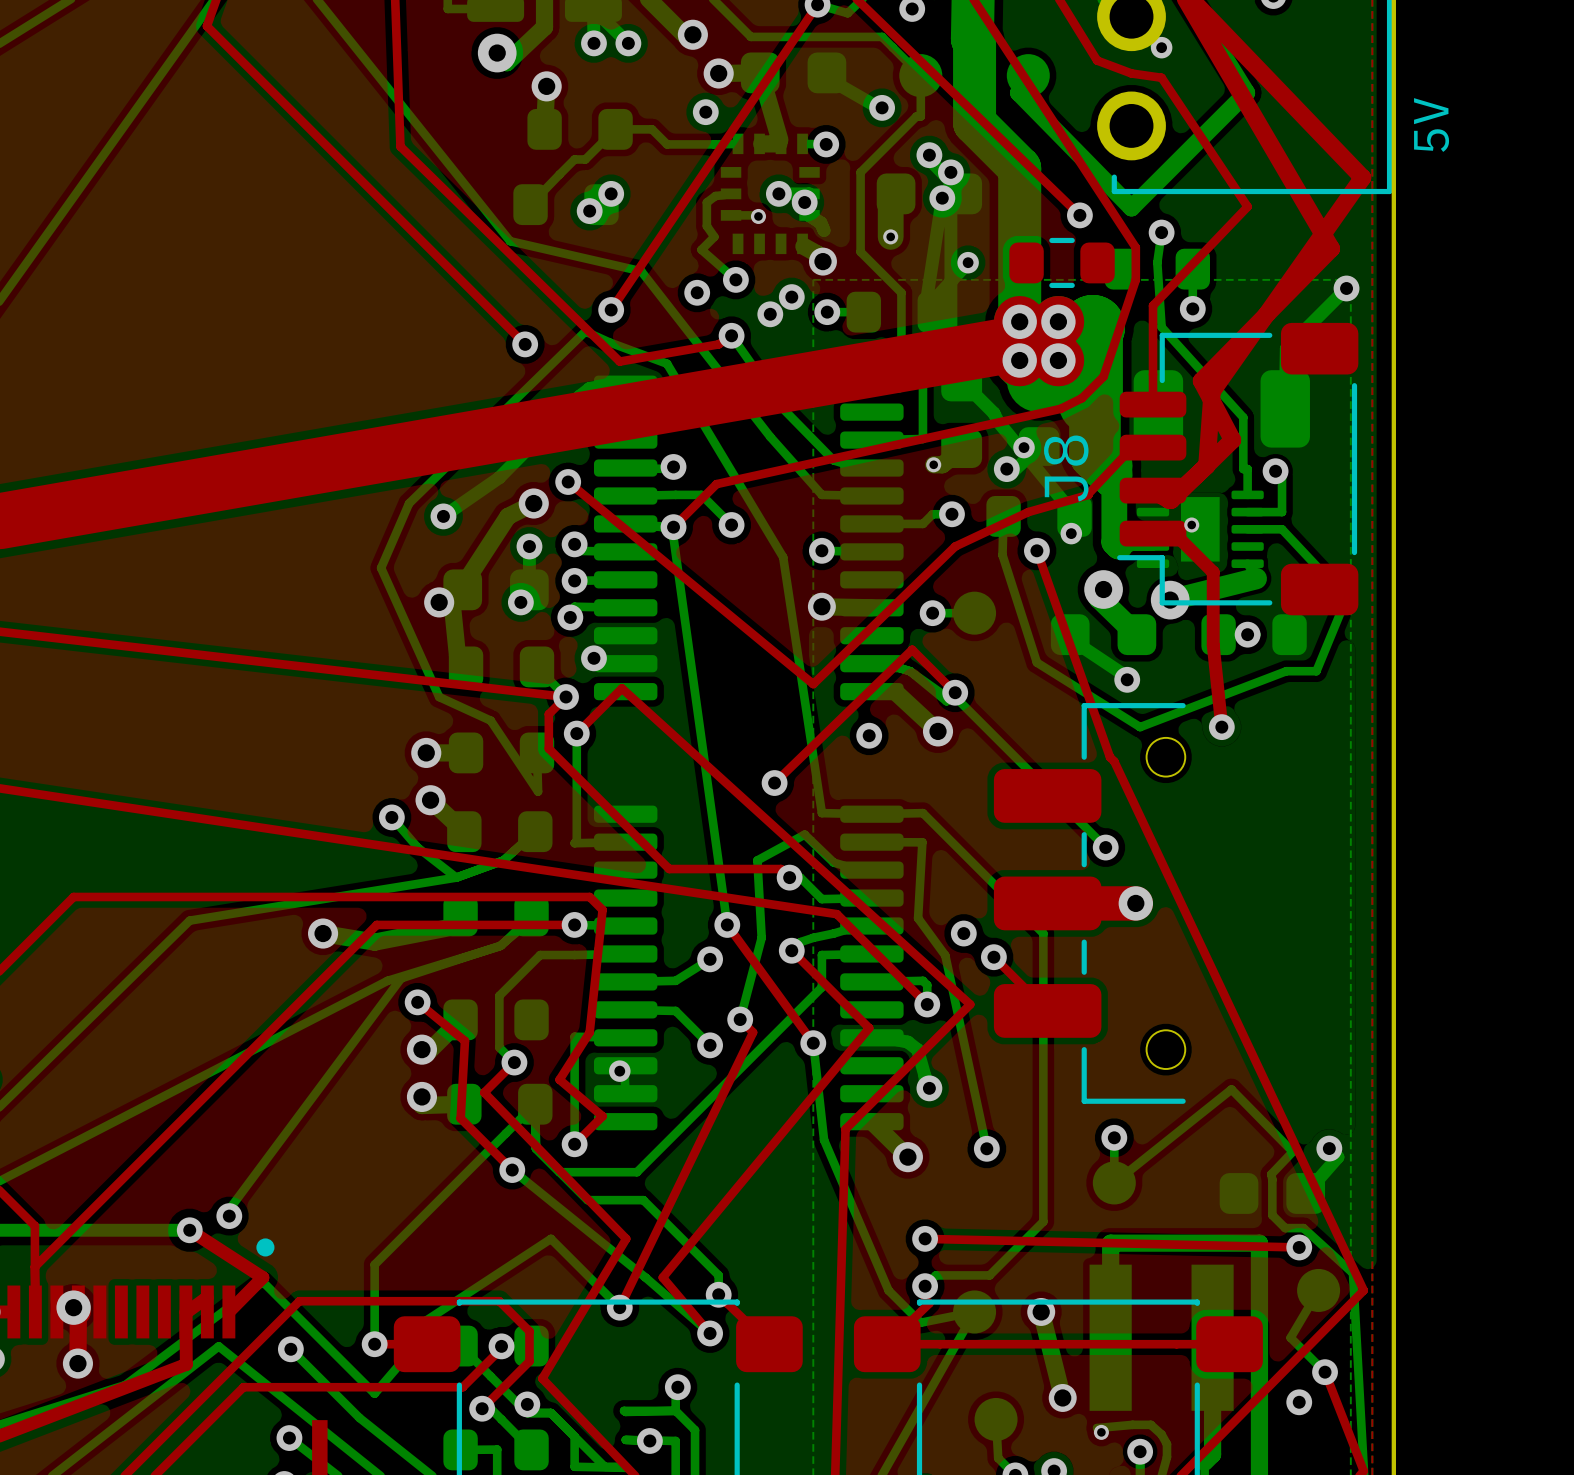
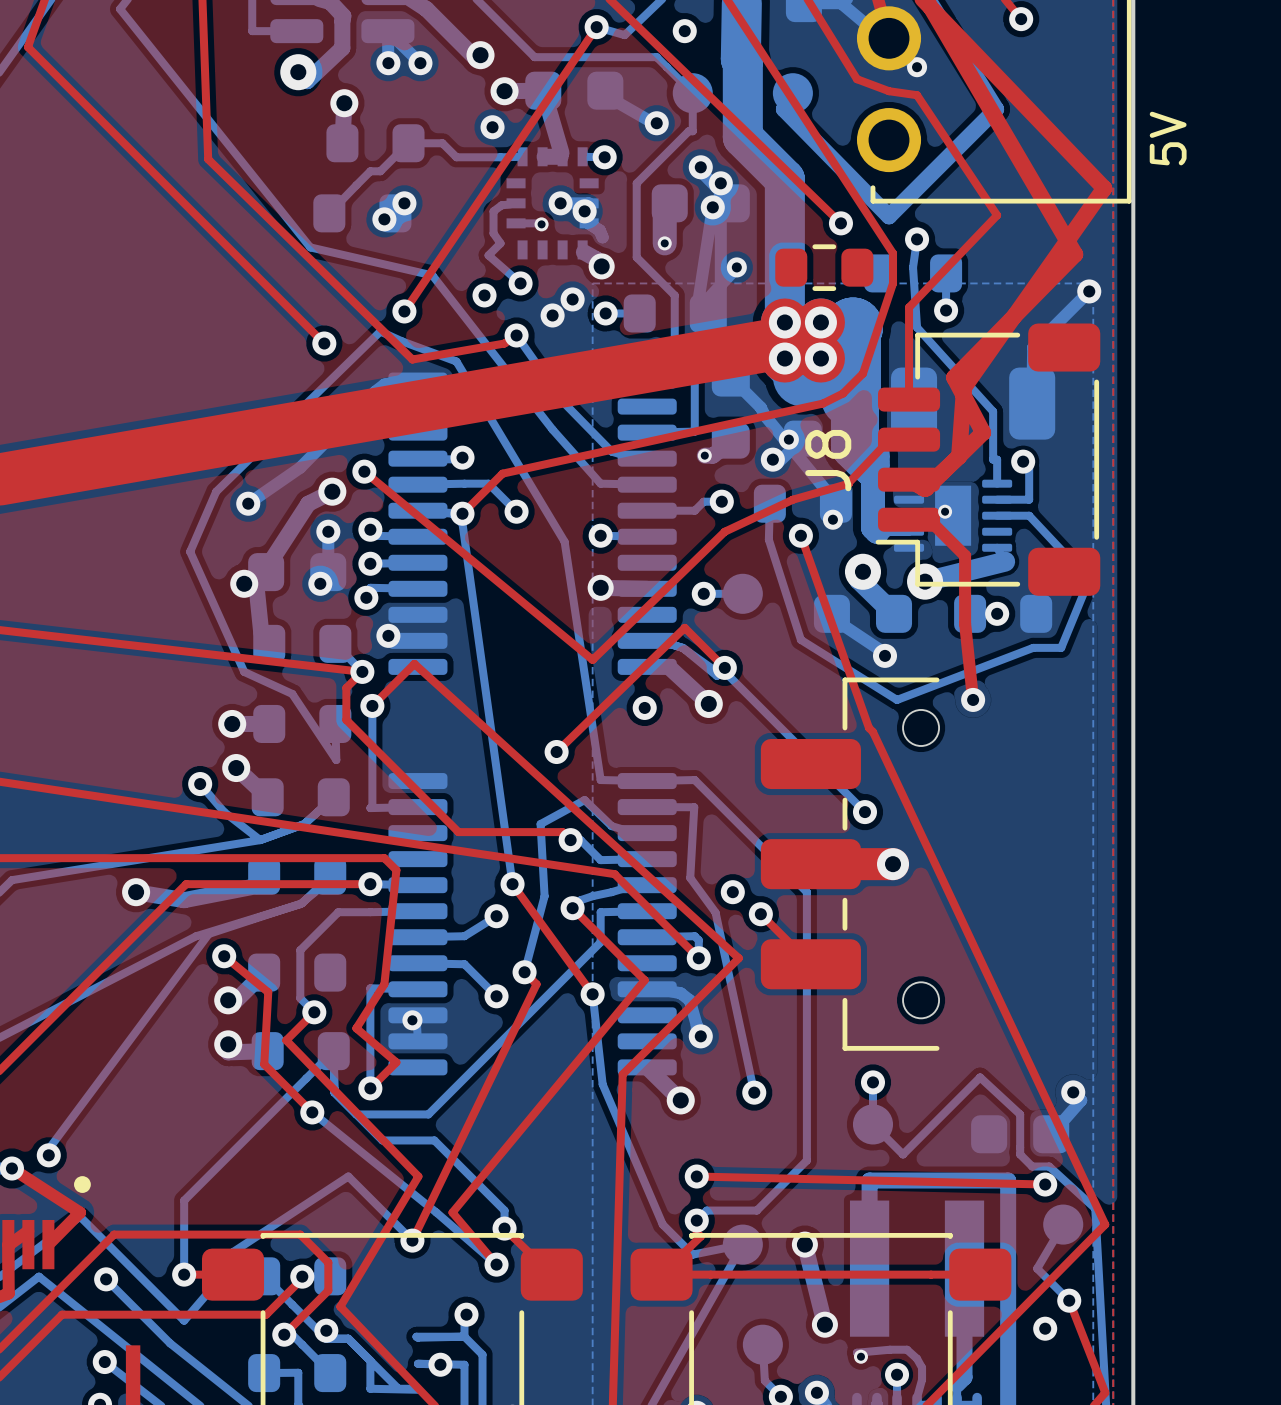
bottom track: (1272, 1179) (1271, 1174) (1292, 1151) (1231, 1089) (1114, 1182) -> (1020, 1121) (1020, 1114) (980, 1077) (903, 1154) (872, 1124)

